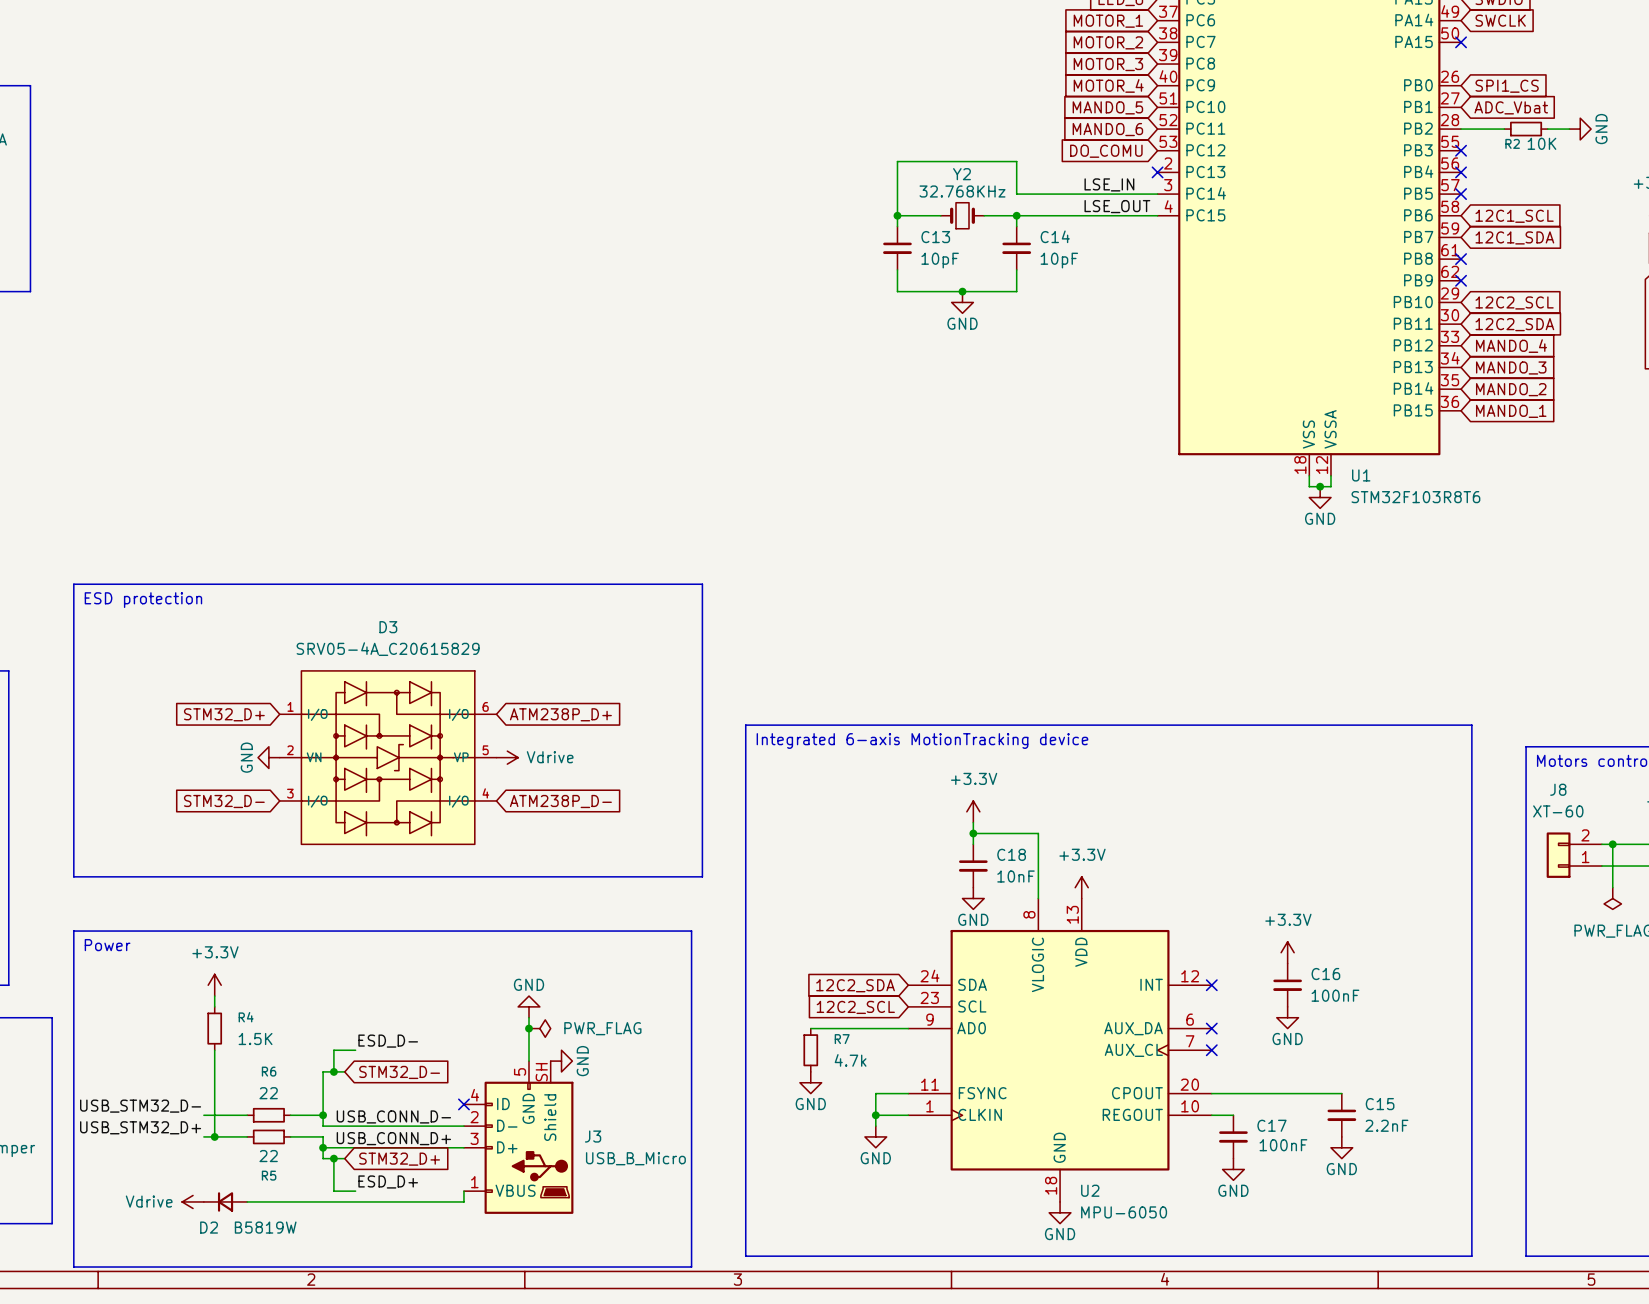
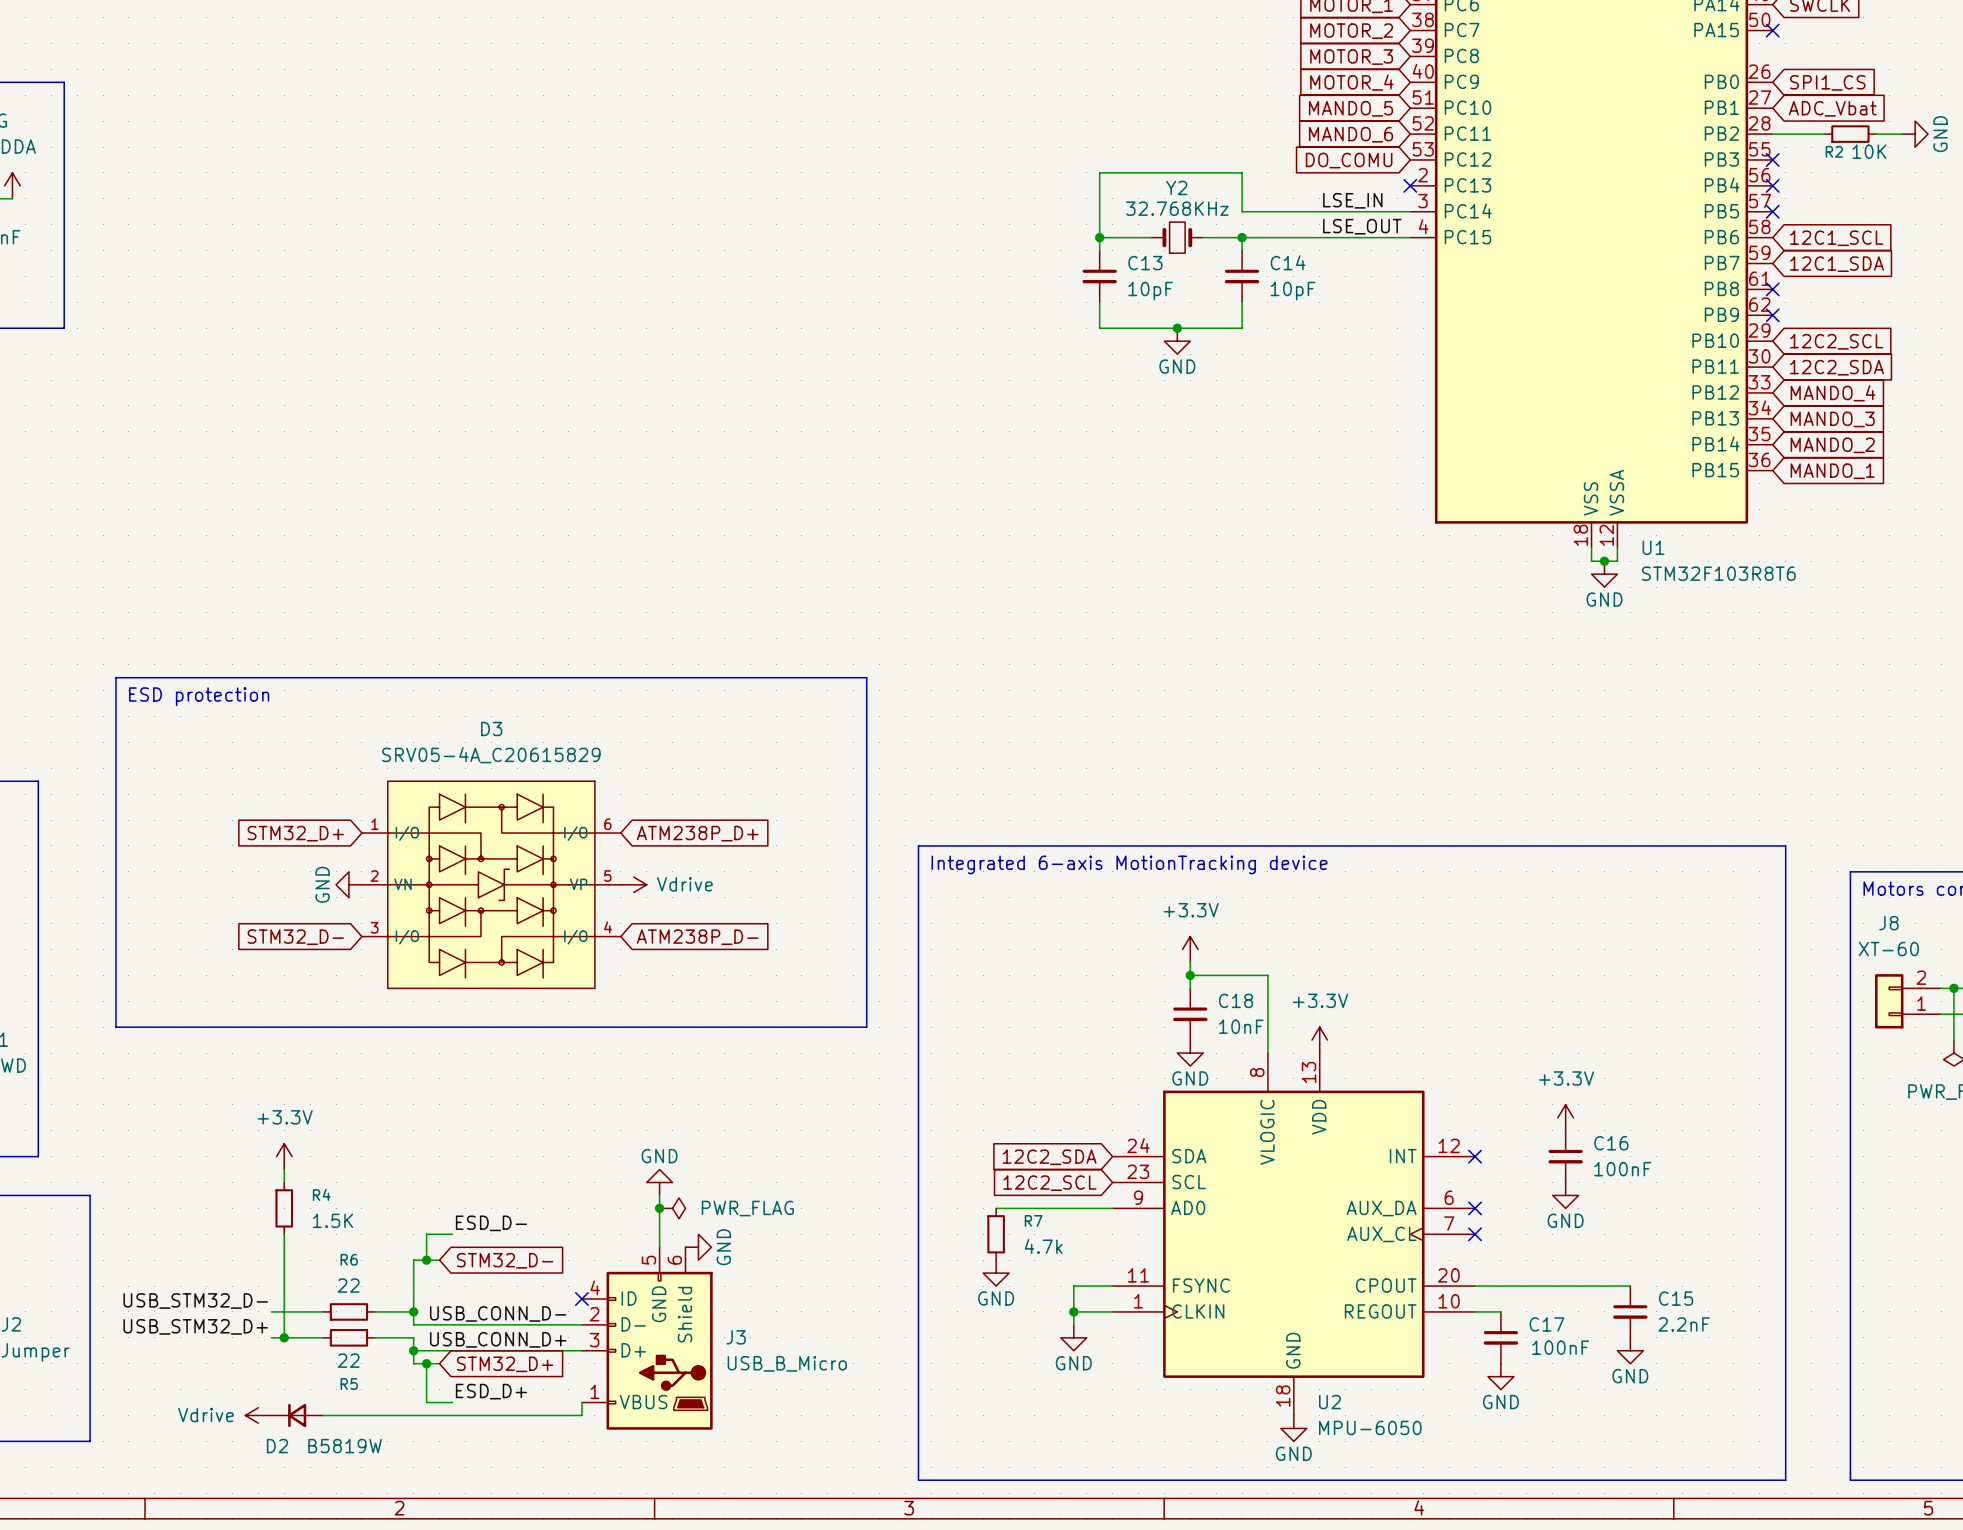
line: (73, 931) (691, 931) (691, 1267) (73, 1267) (73, 931) -> none
text: Power (107, 945) -> none
J3 pin number: SH (541, 1072) -> 6 (674, 1260)

